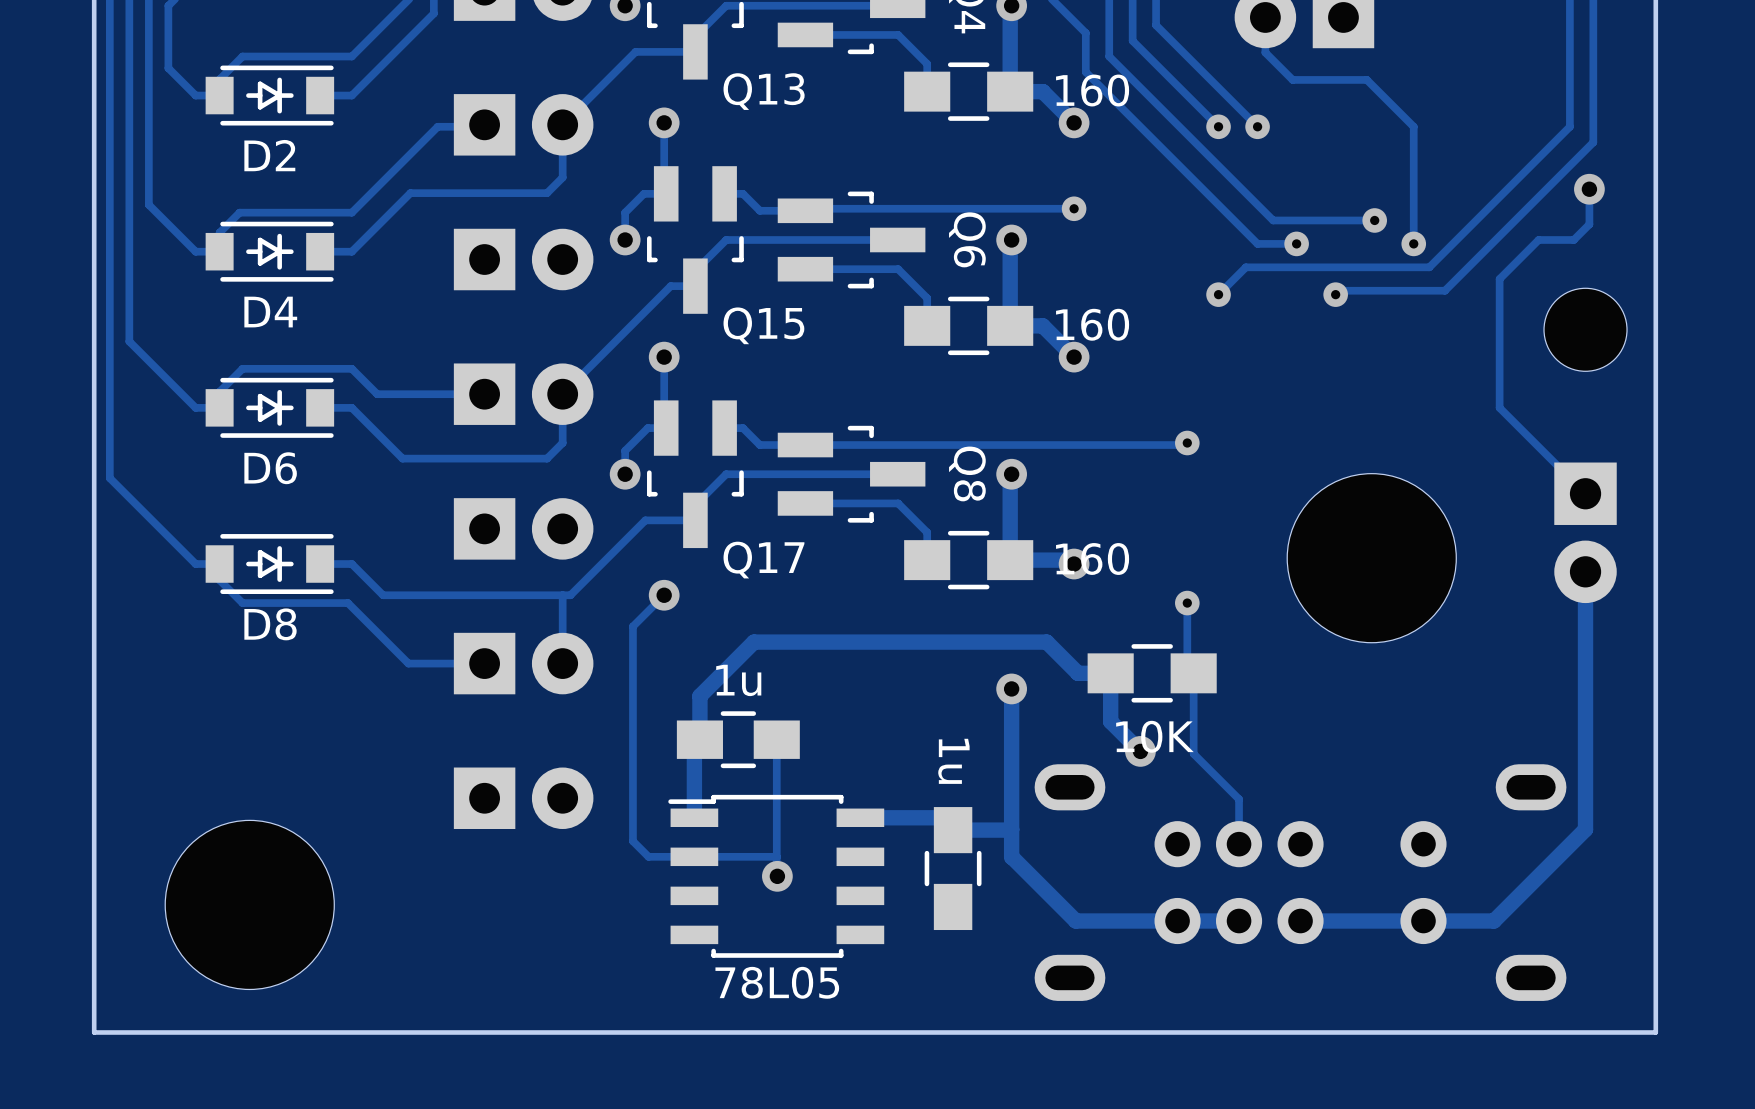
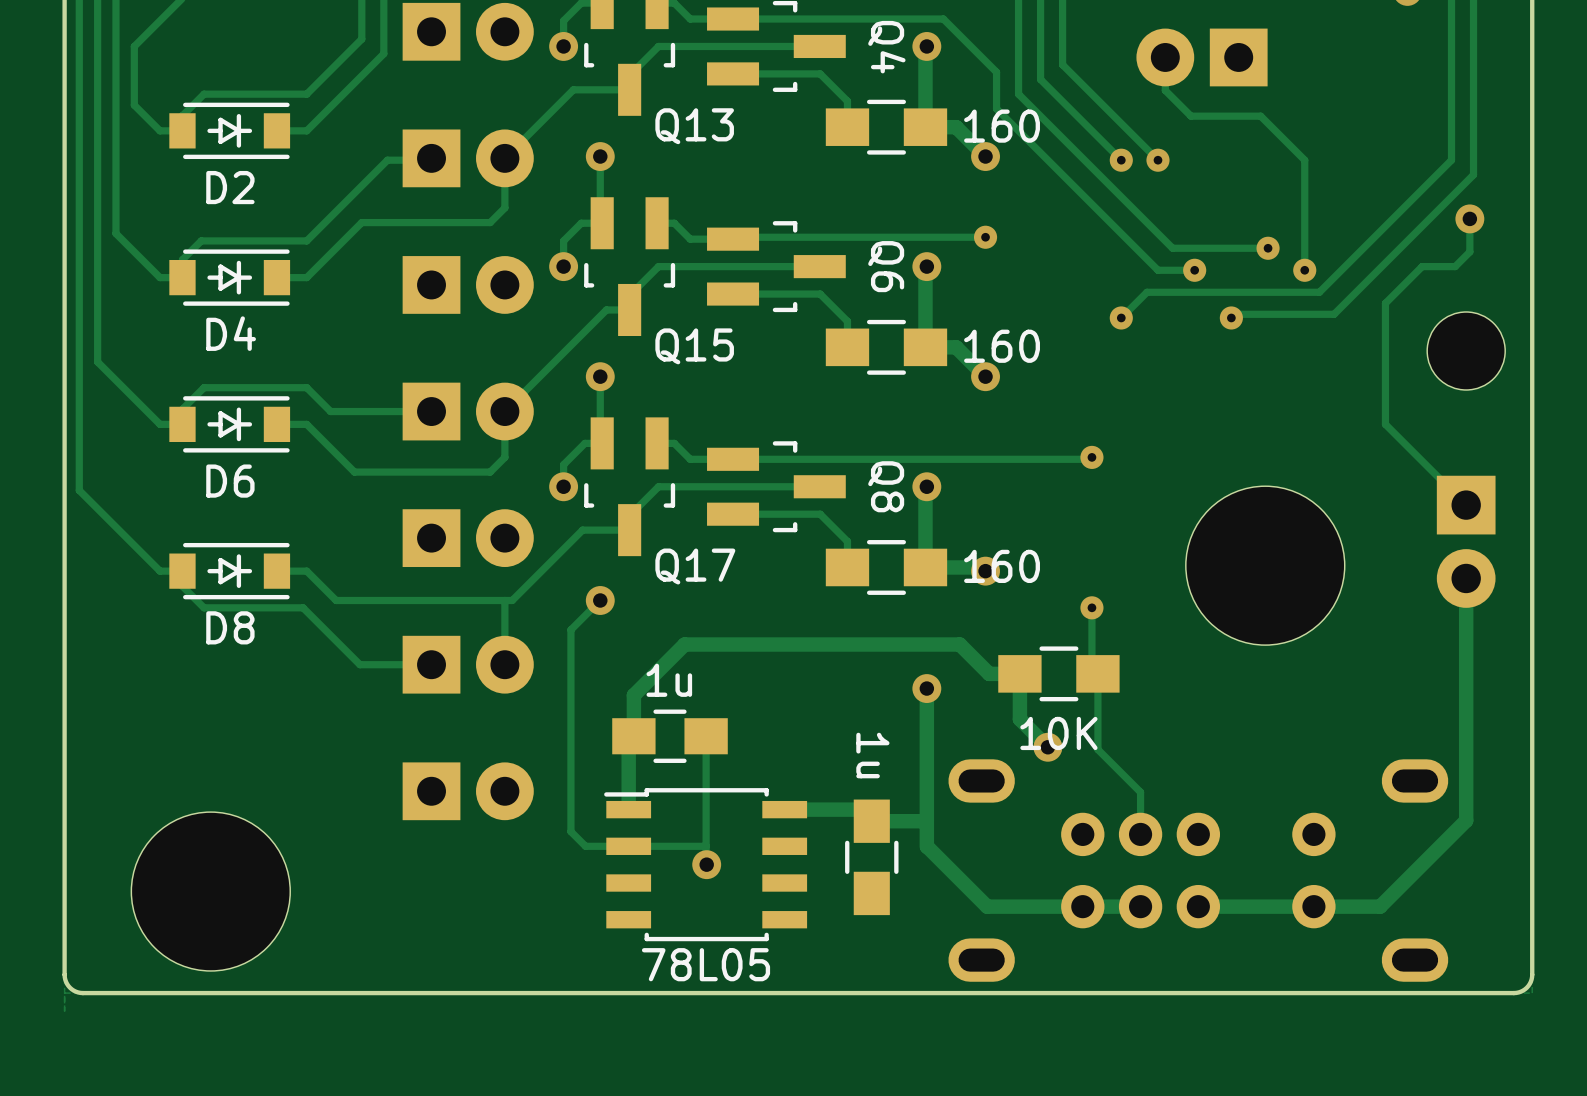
board edge: (1655, 993) (1655, 1032) (94, 1032) (94, 993) -> (1532, 974) (1526, 987) (1513, 993) (82, 993) (69, 987) (64, 974)

